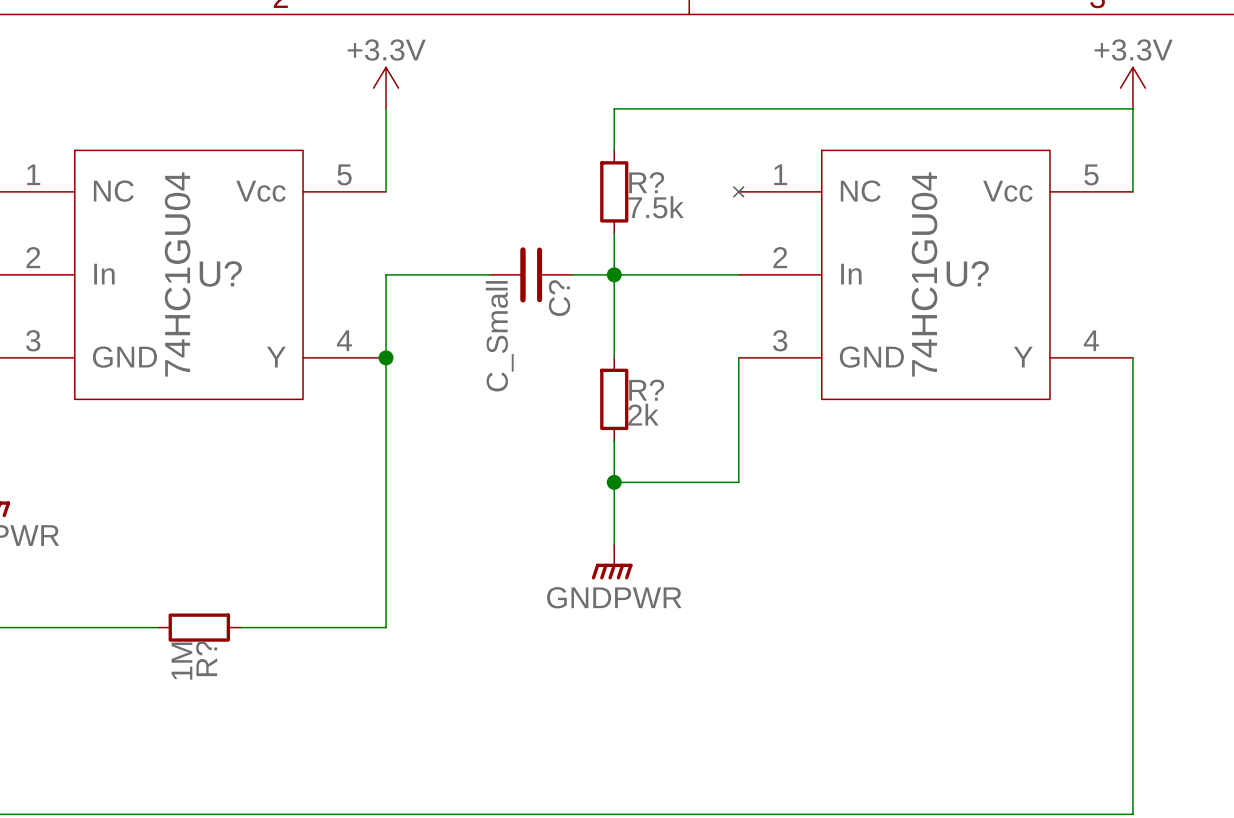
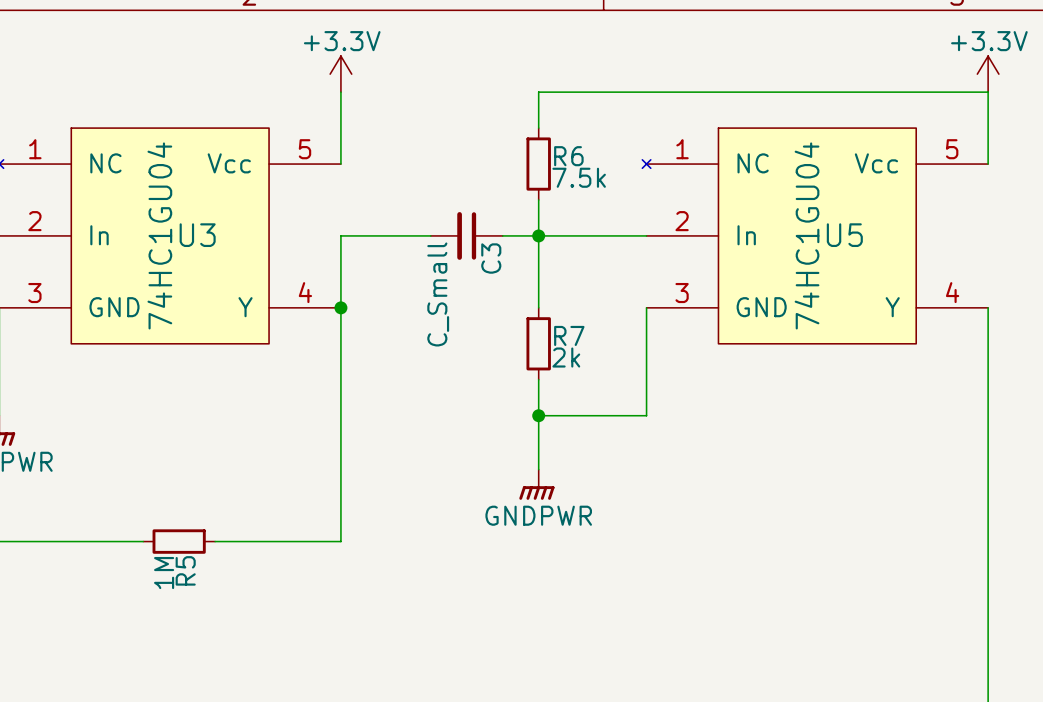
R? name: R? (646, 182) -> R6 (568, 156)
U? name: U? (220, 273) -> U3 (197, 235)
U? name: U? (967, 273) -> U5 (844, 235)
C? name: C? (559, 298) -> C3 (491, 258)
R? name: R? (646, 390) -> R7 (569, 335)
R? name: R? (206, 658) -> R5 (185, 570)

